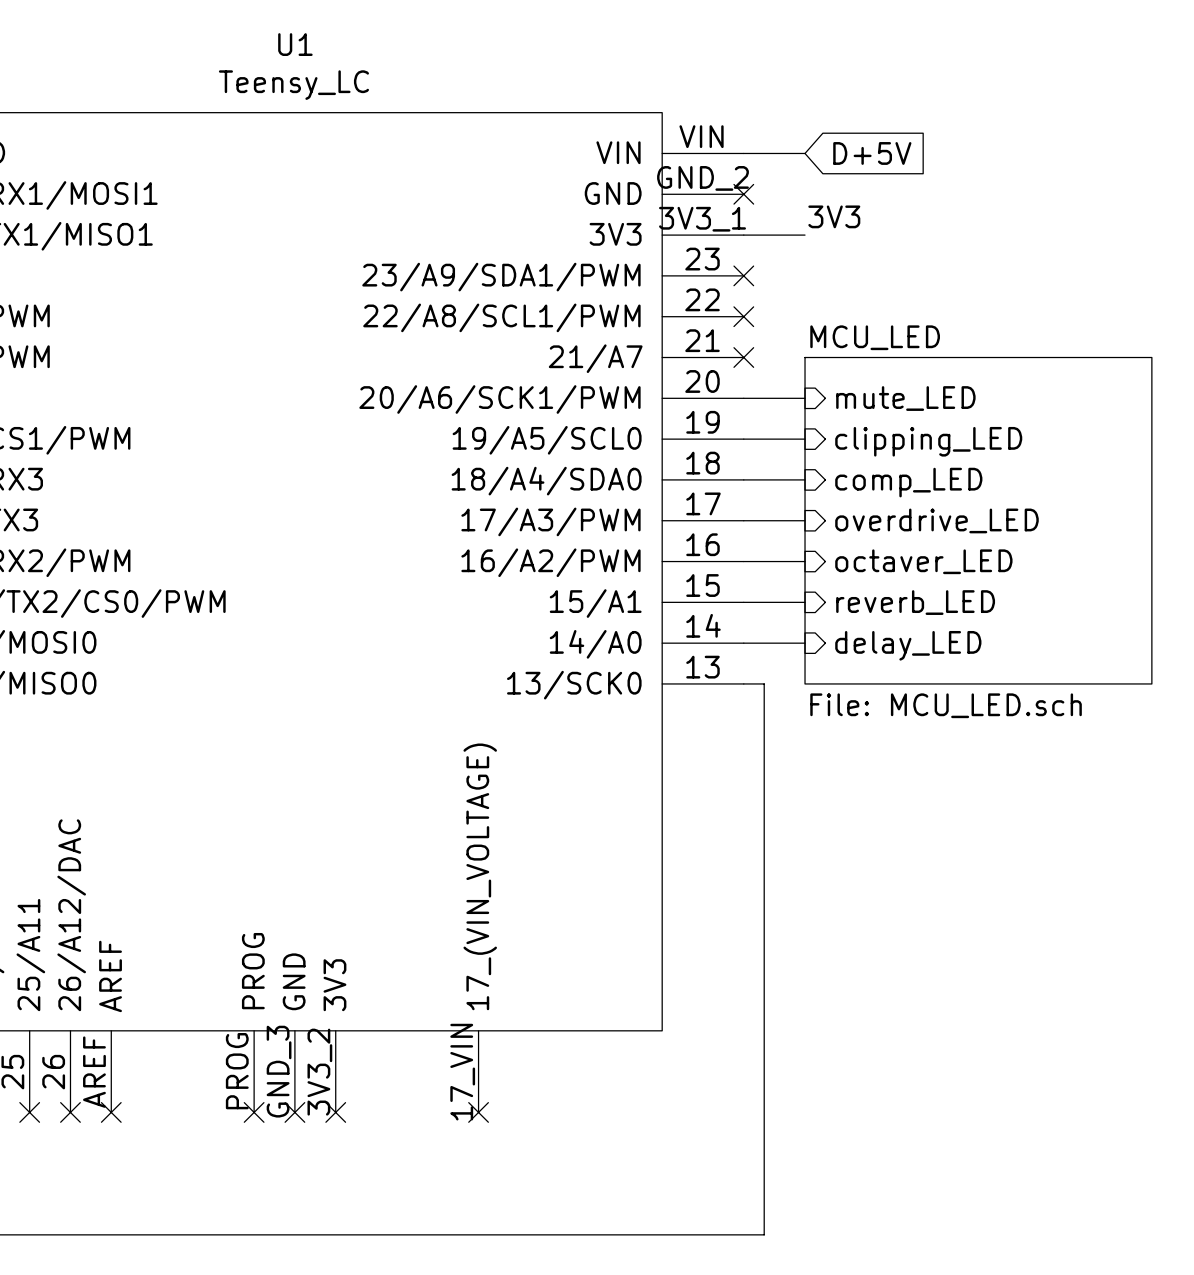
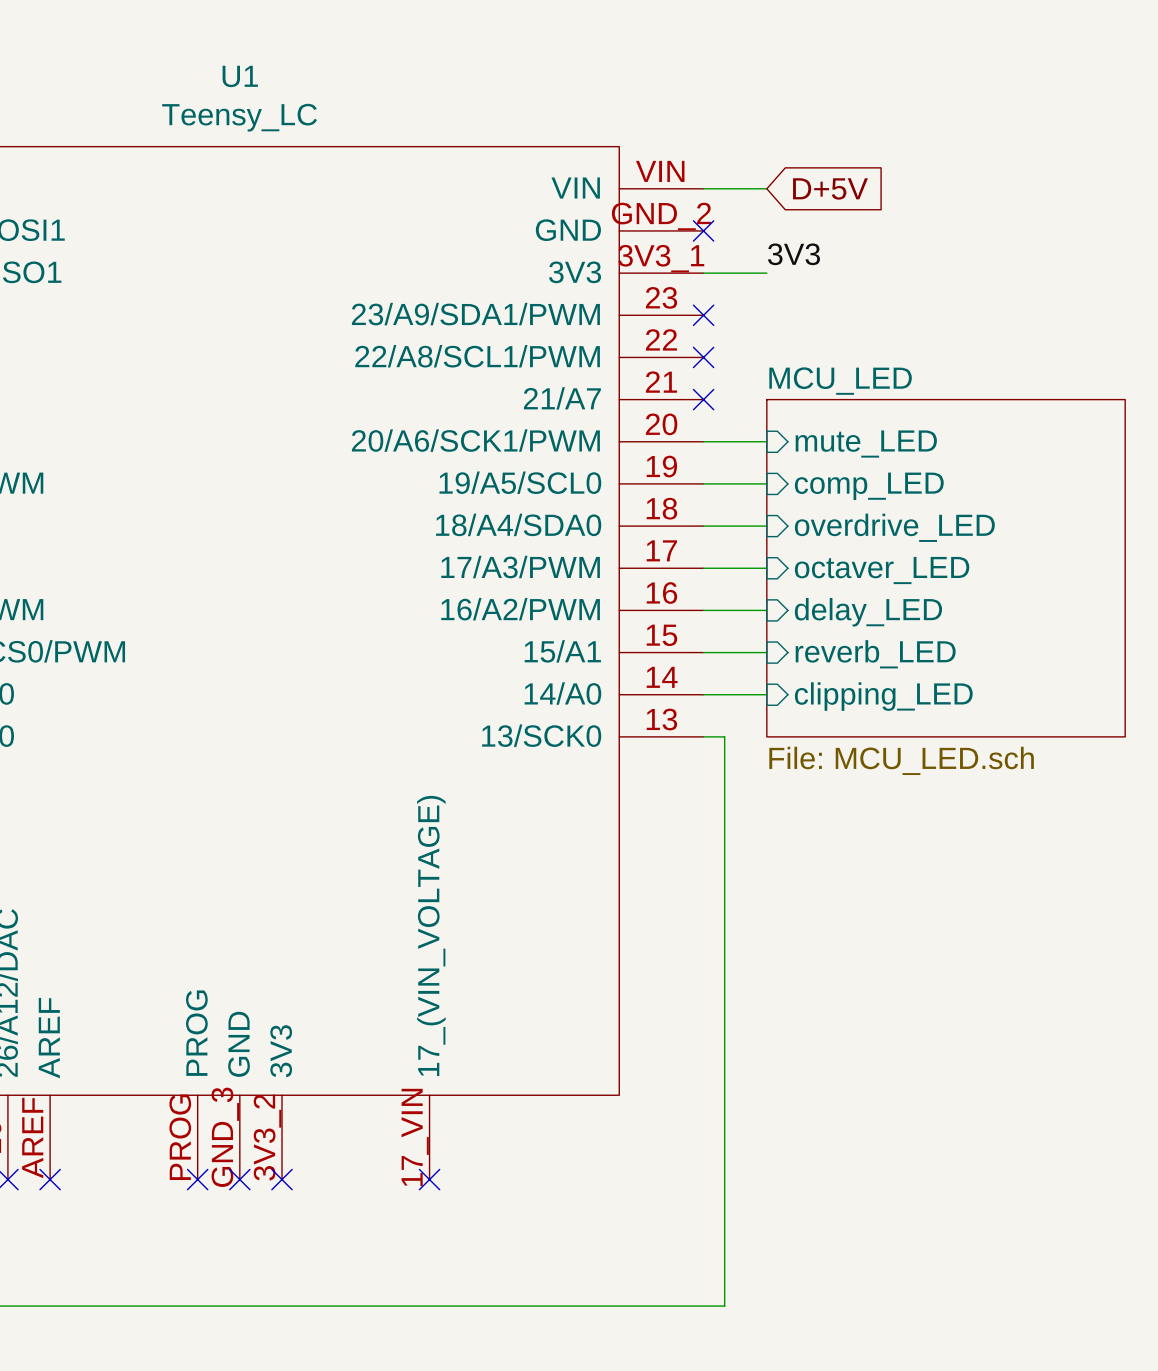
sheet pin: clipping_LED (928, 441) -> comp_LED (869, 486)
sheet pin: comp_LED (908, 482) -> overdrive_LED (894, 527)
sheet pin: overdrive_LED (936, 520) -> octaver_LED (882, 570)
sheet pin: octaver_LED (923, 561) -> delay_LED (868, 612)
sheet pin: delay_LED (908, 645) -> clipping_LED (883, 696)

